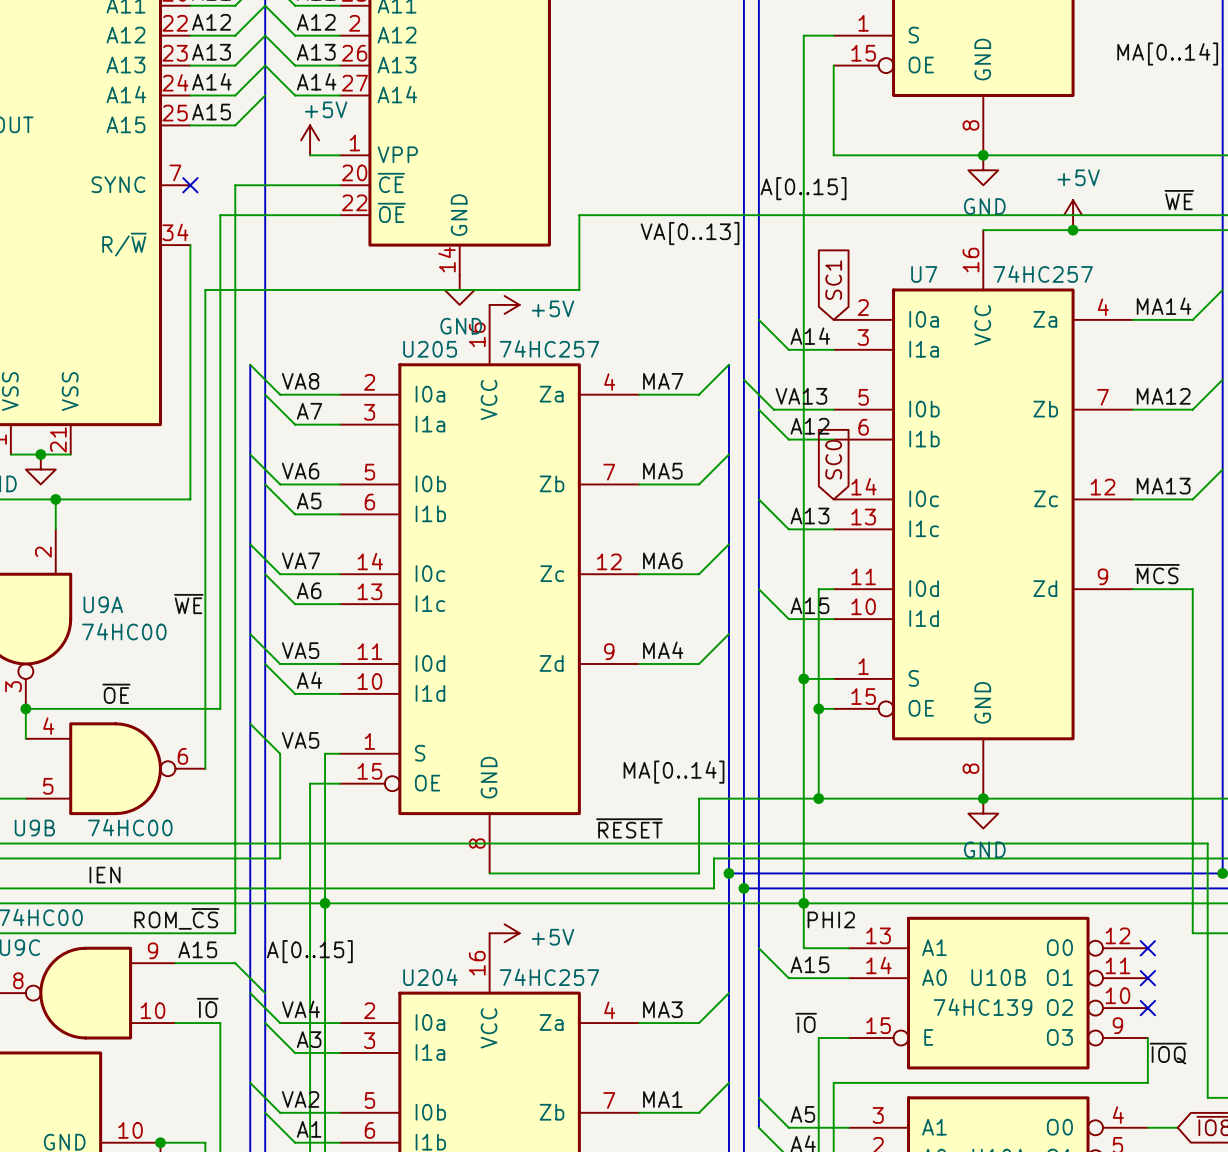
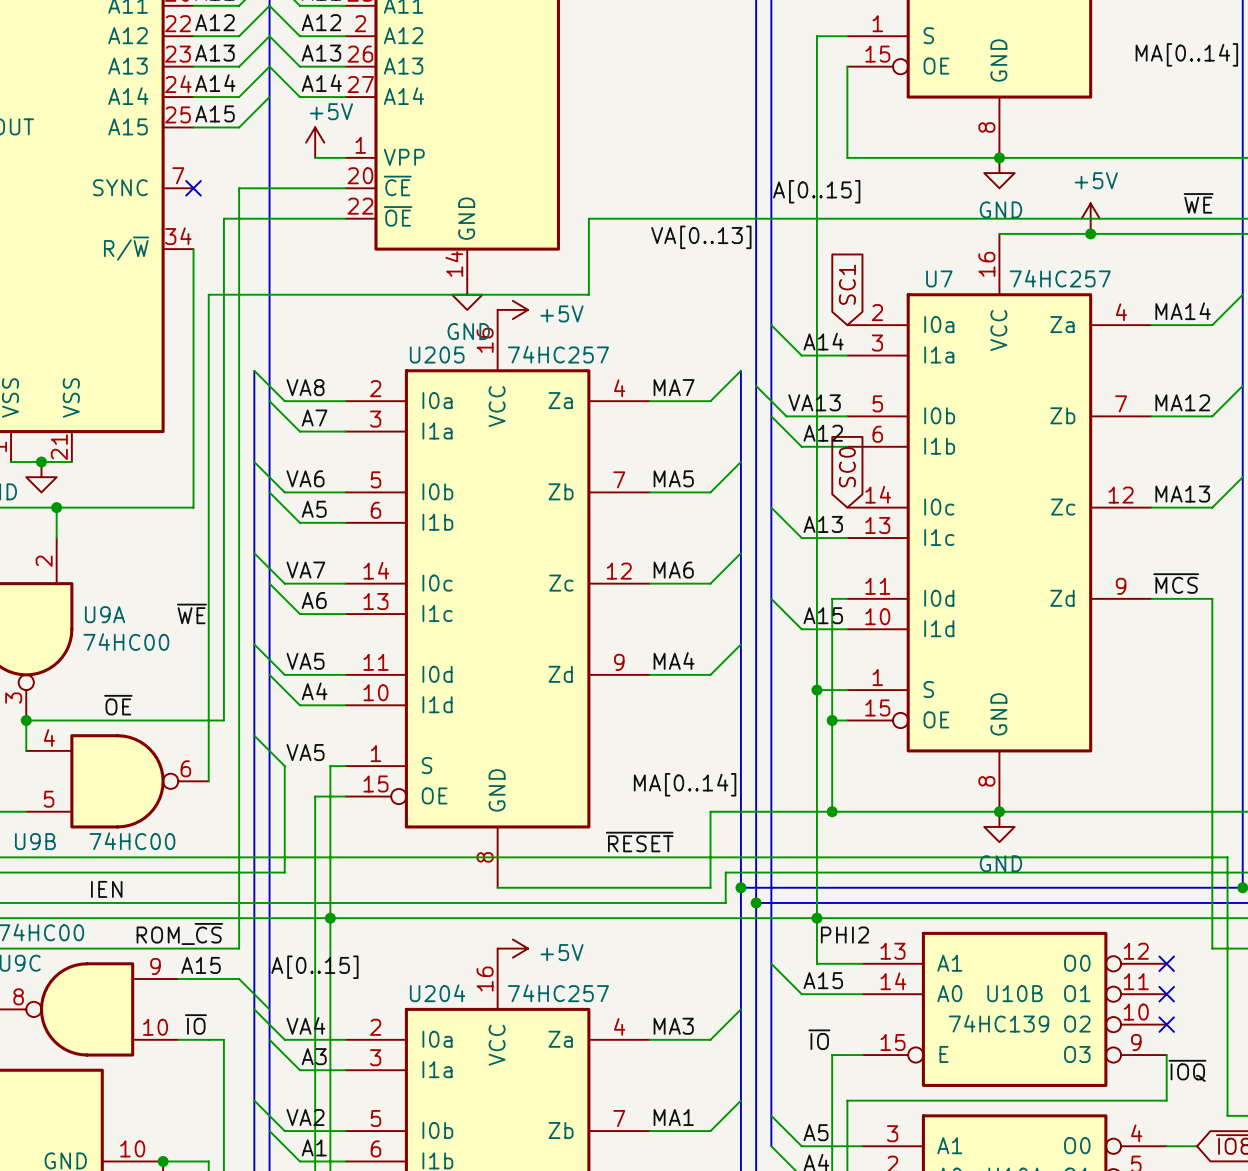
label position: ~{IO} (207, 1007) -> ~{IO} (195, 1024)

